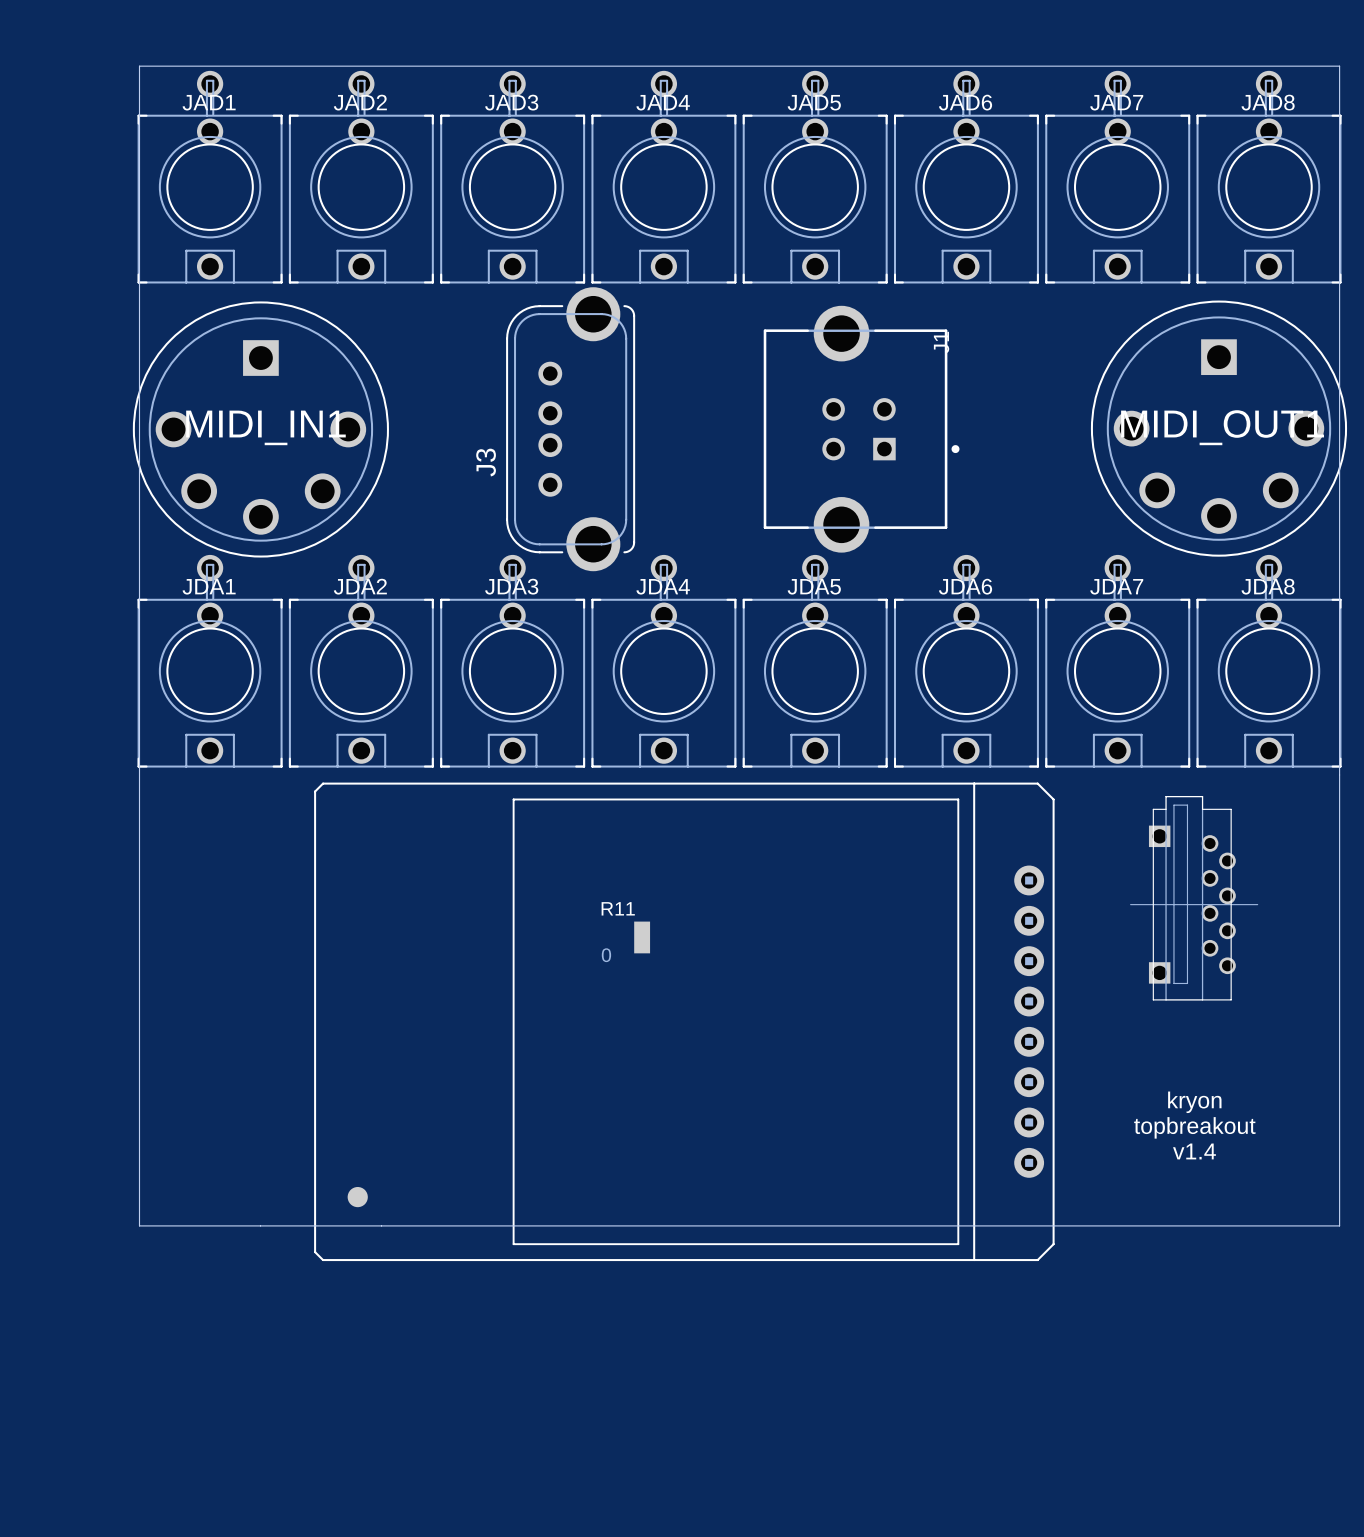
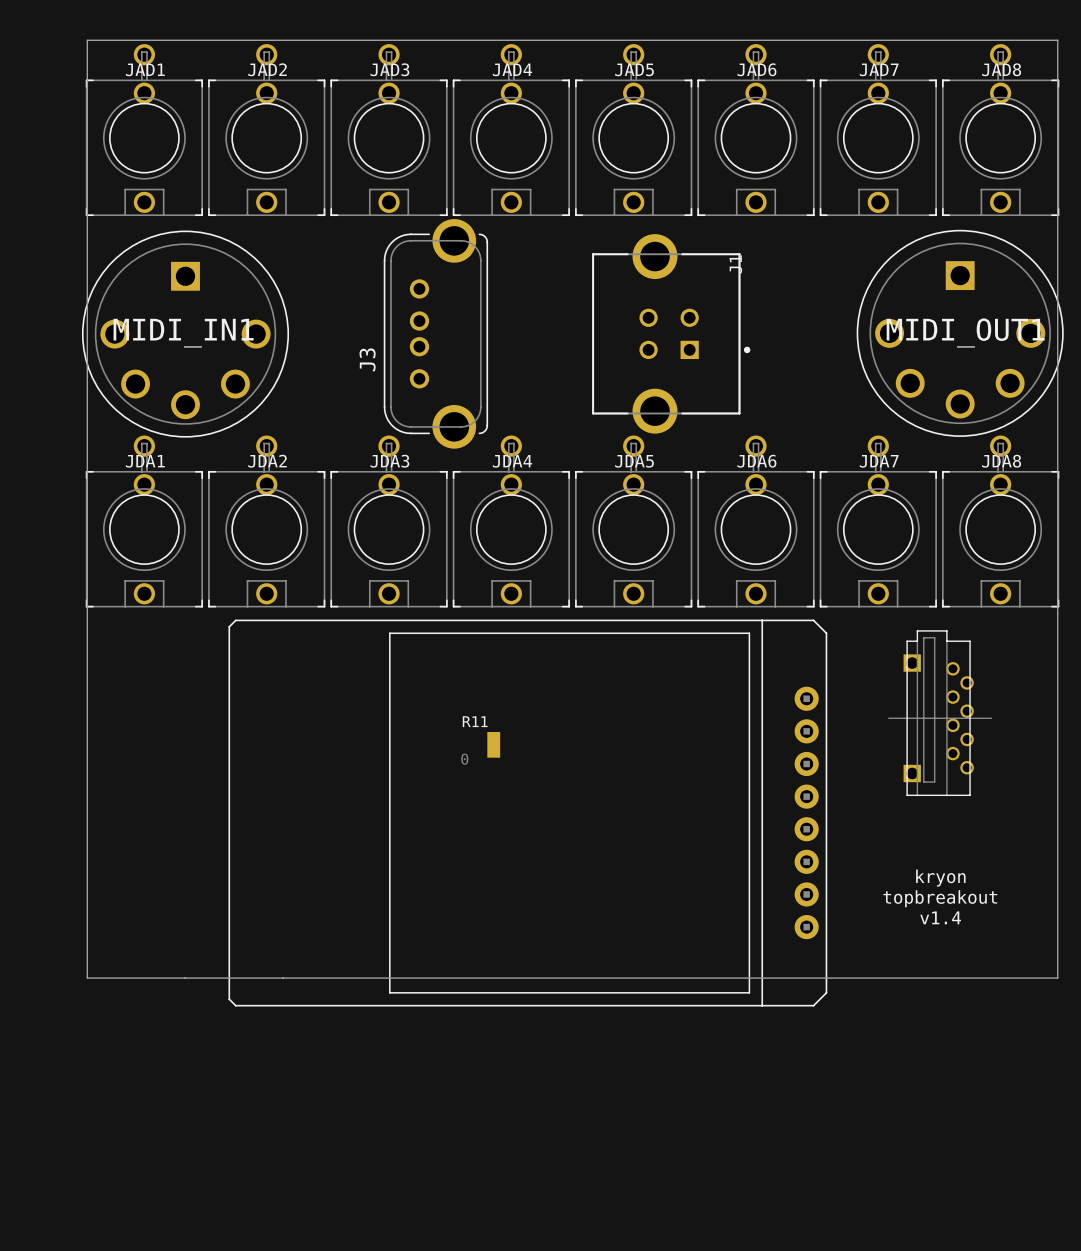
part: (357, 1197) -> none

